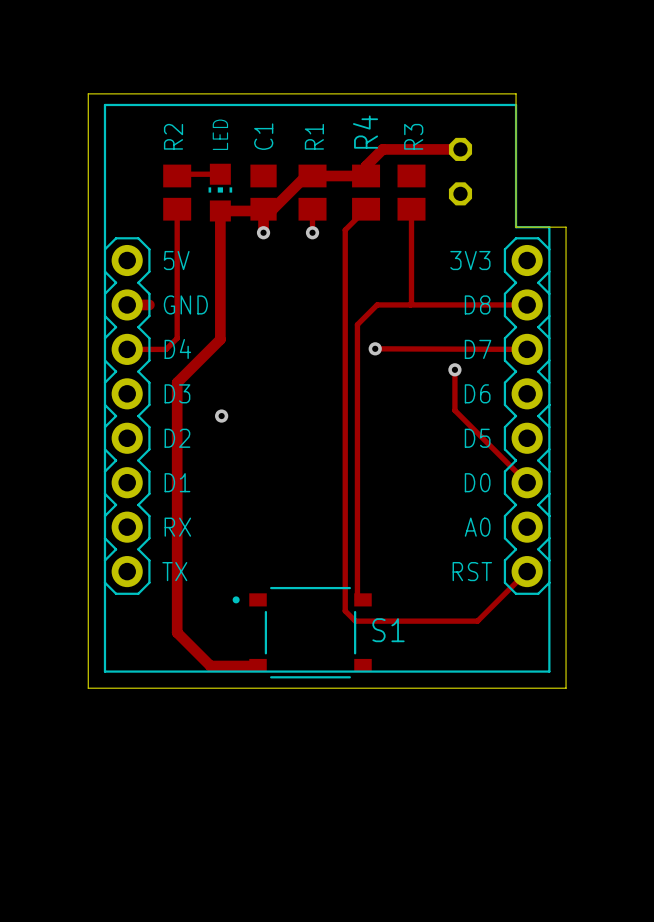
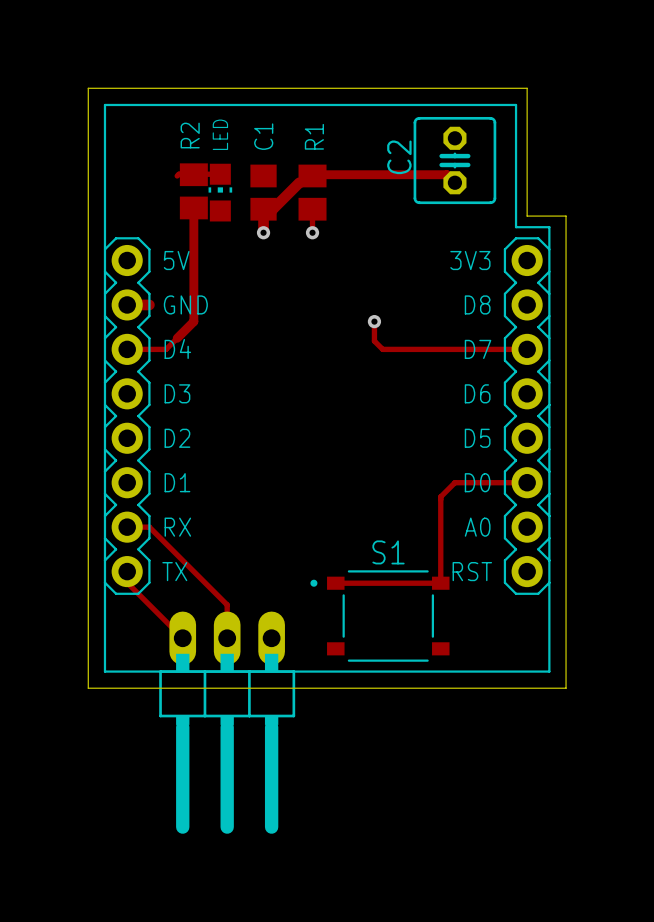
board edge: (88, 93) (516, 93) (516, 227) (566, 227) -> (88, 93) (88, 88) (527, 88) (527, 216) (566, 216) (566, 227)
track: (460, 149) (382, 149) (366, 166) (366, 175) (306, 175) (299, 182) -> (454, 182) (446, 174) (310, 174) (302, 182) (299, 182)
C2 side: bottom (460, 171) -> top (454, 160)
R2 position: (177, 192) -> (193, 191)
R4: (366, 192) -> none
R3: (411, 192) -> none
track: (177, 209) (177, 338) -> (193, 207) (193, 321) (177, 338)
track: (261, 209) (220, 210) (220, 339) (177, 382) (177, 632) -> (127, 571) (127, 582) (177, 632)
track: (366, 209) (345, 230) (345, 610) (355, 621) (477, 621) (527, 571) -> none
track: (411, 209) (410, 304) -> none
track: (527, 304) (377, 304) (357, 324) (357, 599) (362, 599) -> none
track: (375, 348) (527, 349) -> (374, 321) (374, 341) (382, 349) (527, 349)
via position: (375, 348) -> (374, 321)
track: (454, 369) (454, 410) (527, 482) -> (335, 583) (440, 583) (440, 496) (454, 482) (527, 482)
via: (454, 369) -> none
via: (221, 416) -> none
track: none -> (127, 527) (149, 527) (227, 604) (227, 638)
S1 name position: S1 (388, 630) -> S1 (388, 552)
S1 position: (302, 632) -> (379, 616)
track: (182, 638) (210, 666) (258, 665) -> none
part: none -> (227, 722)

